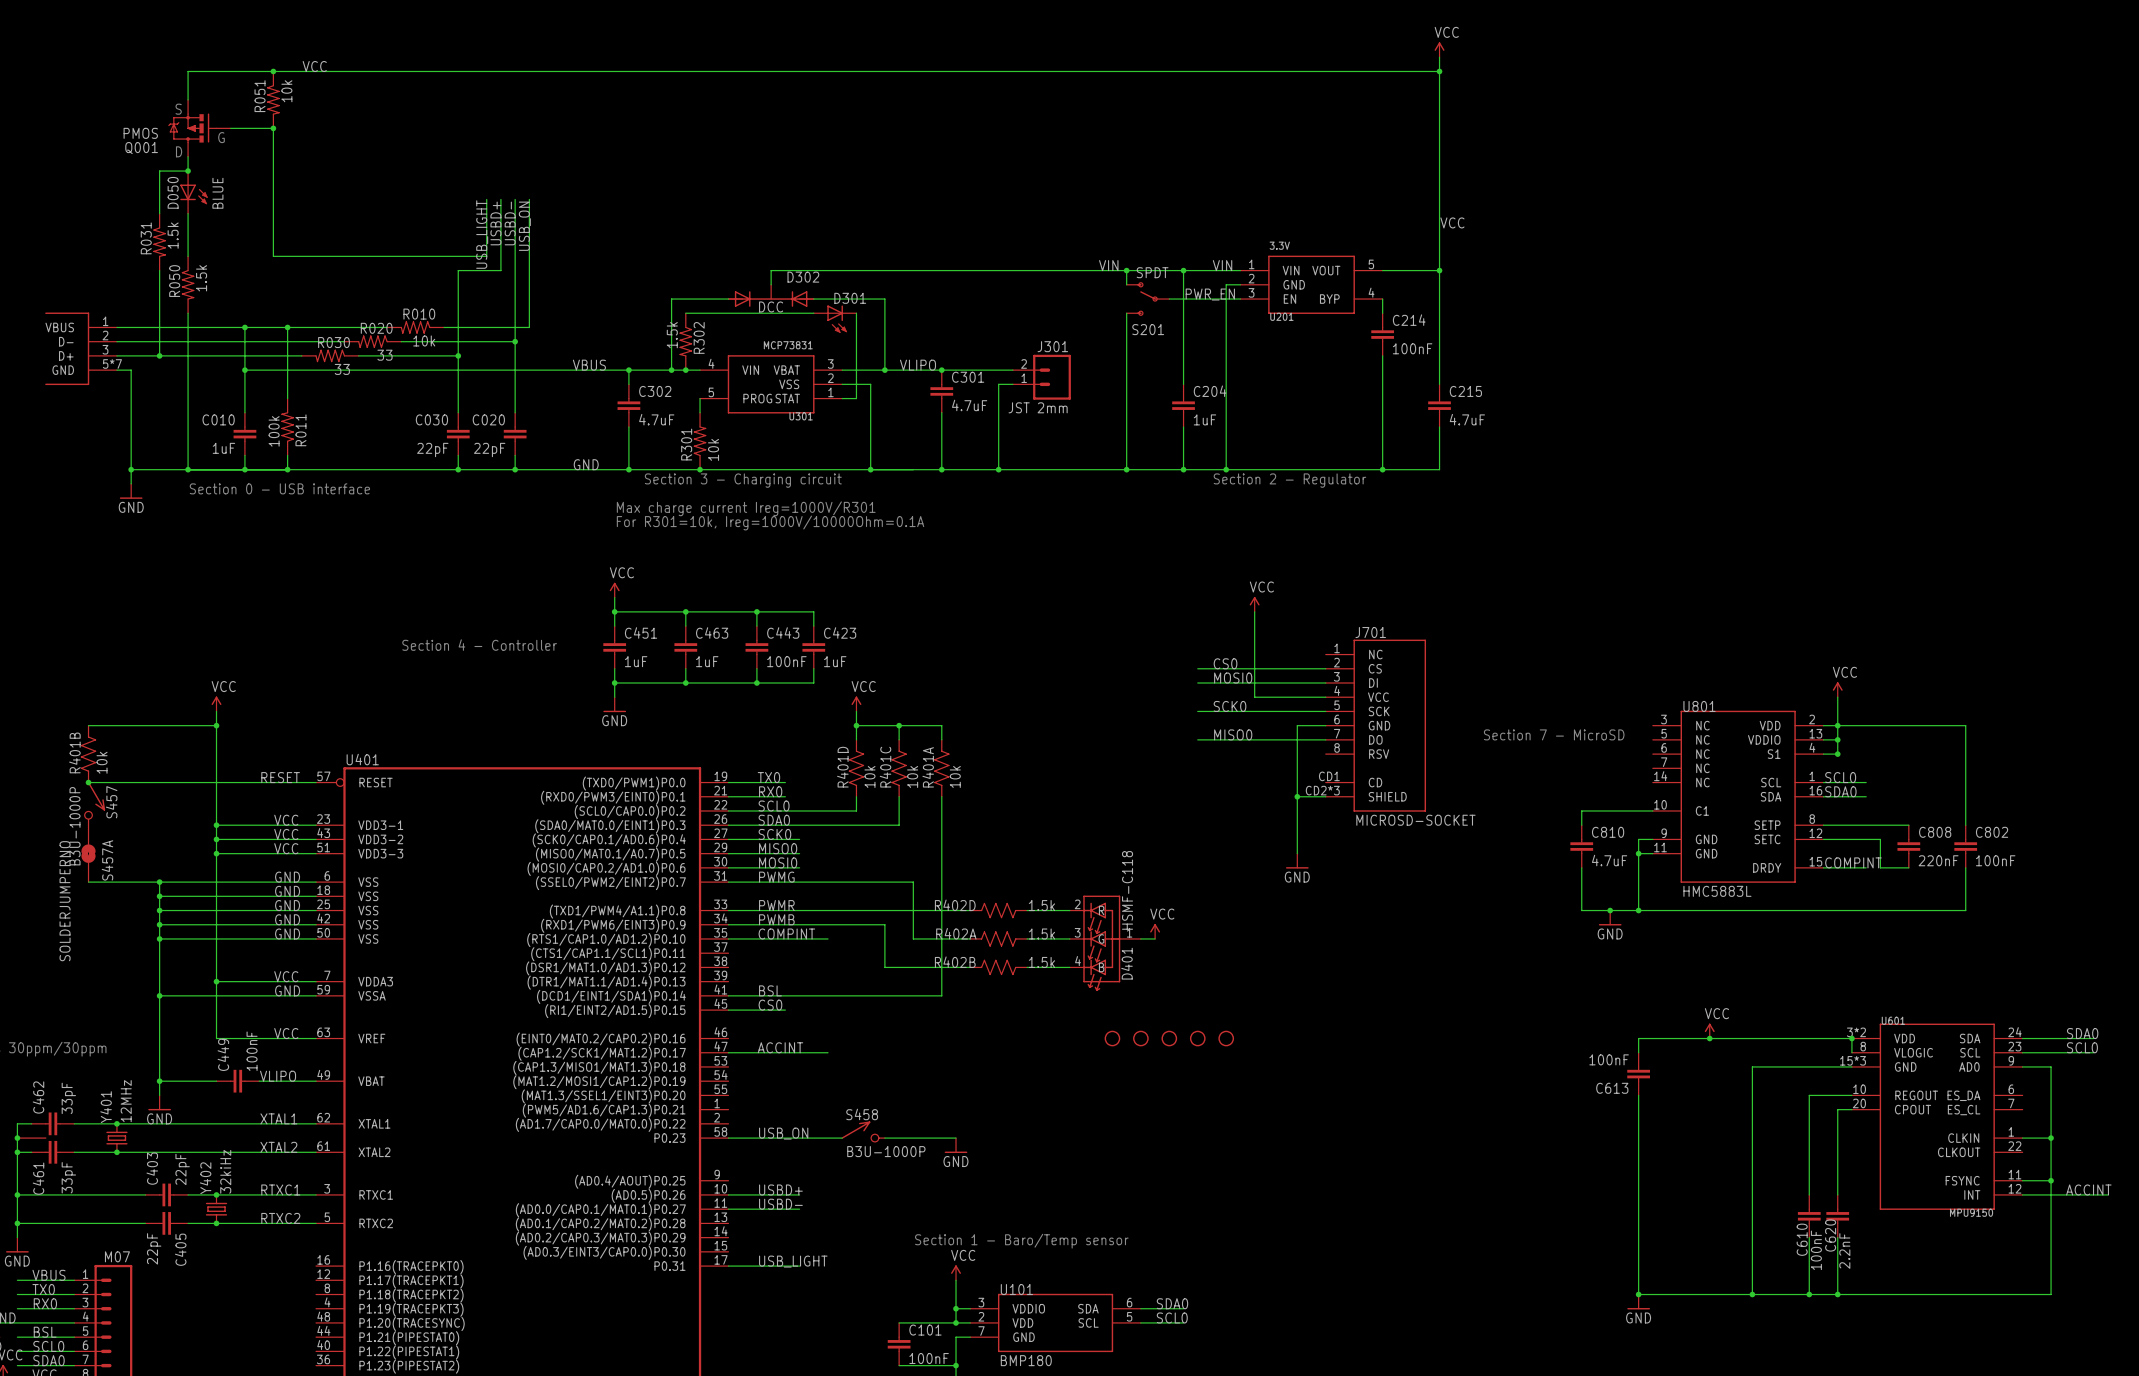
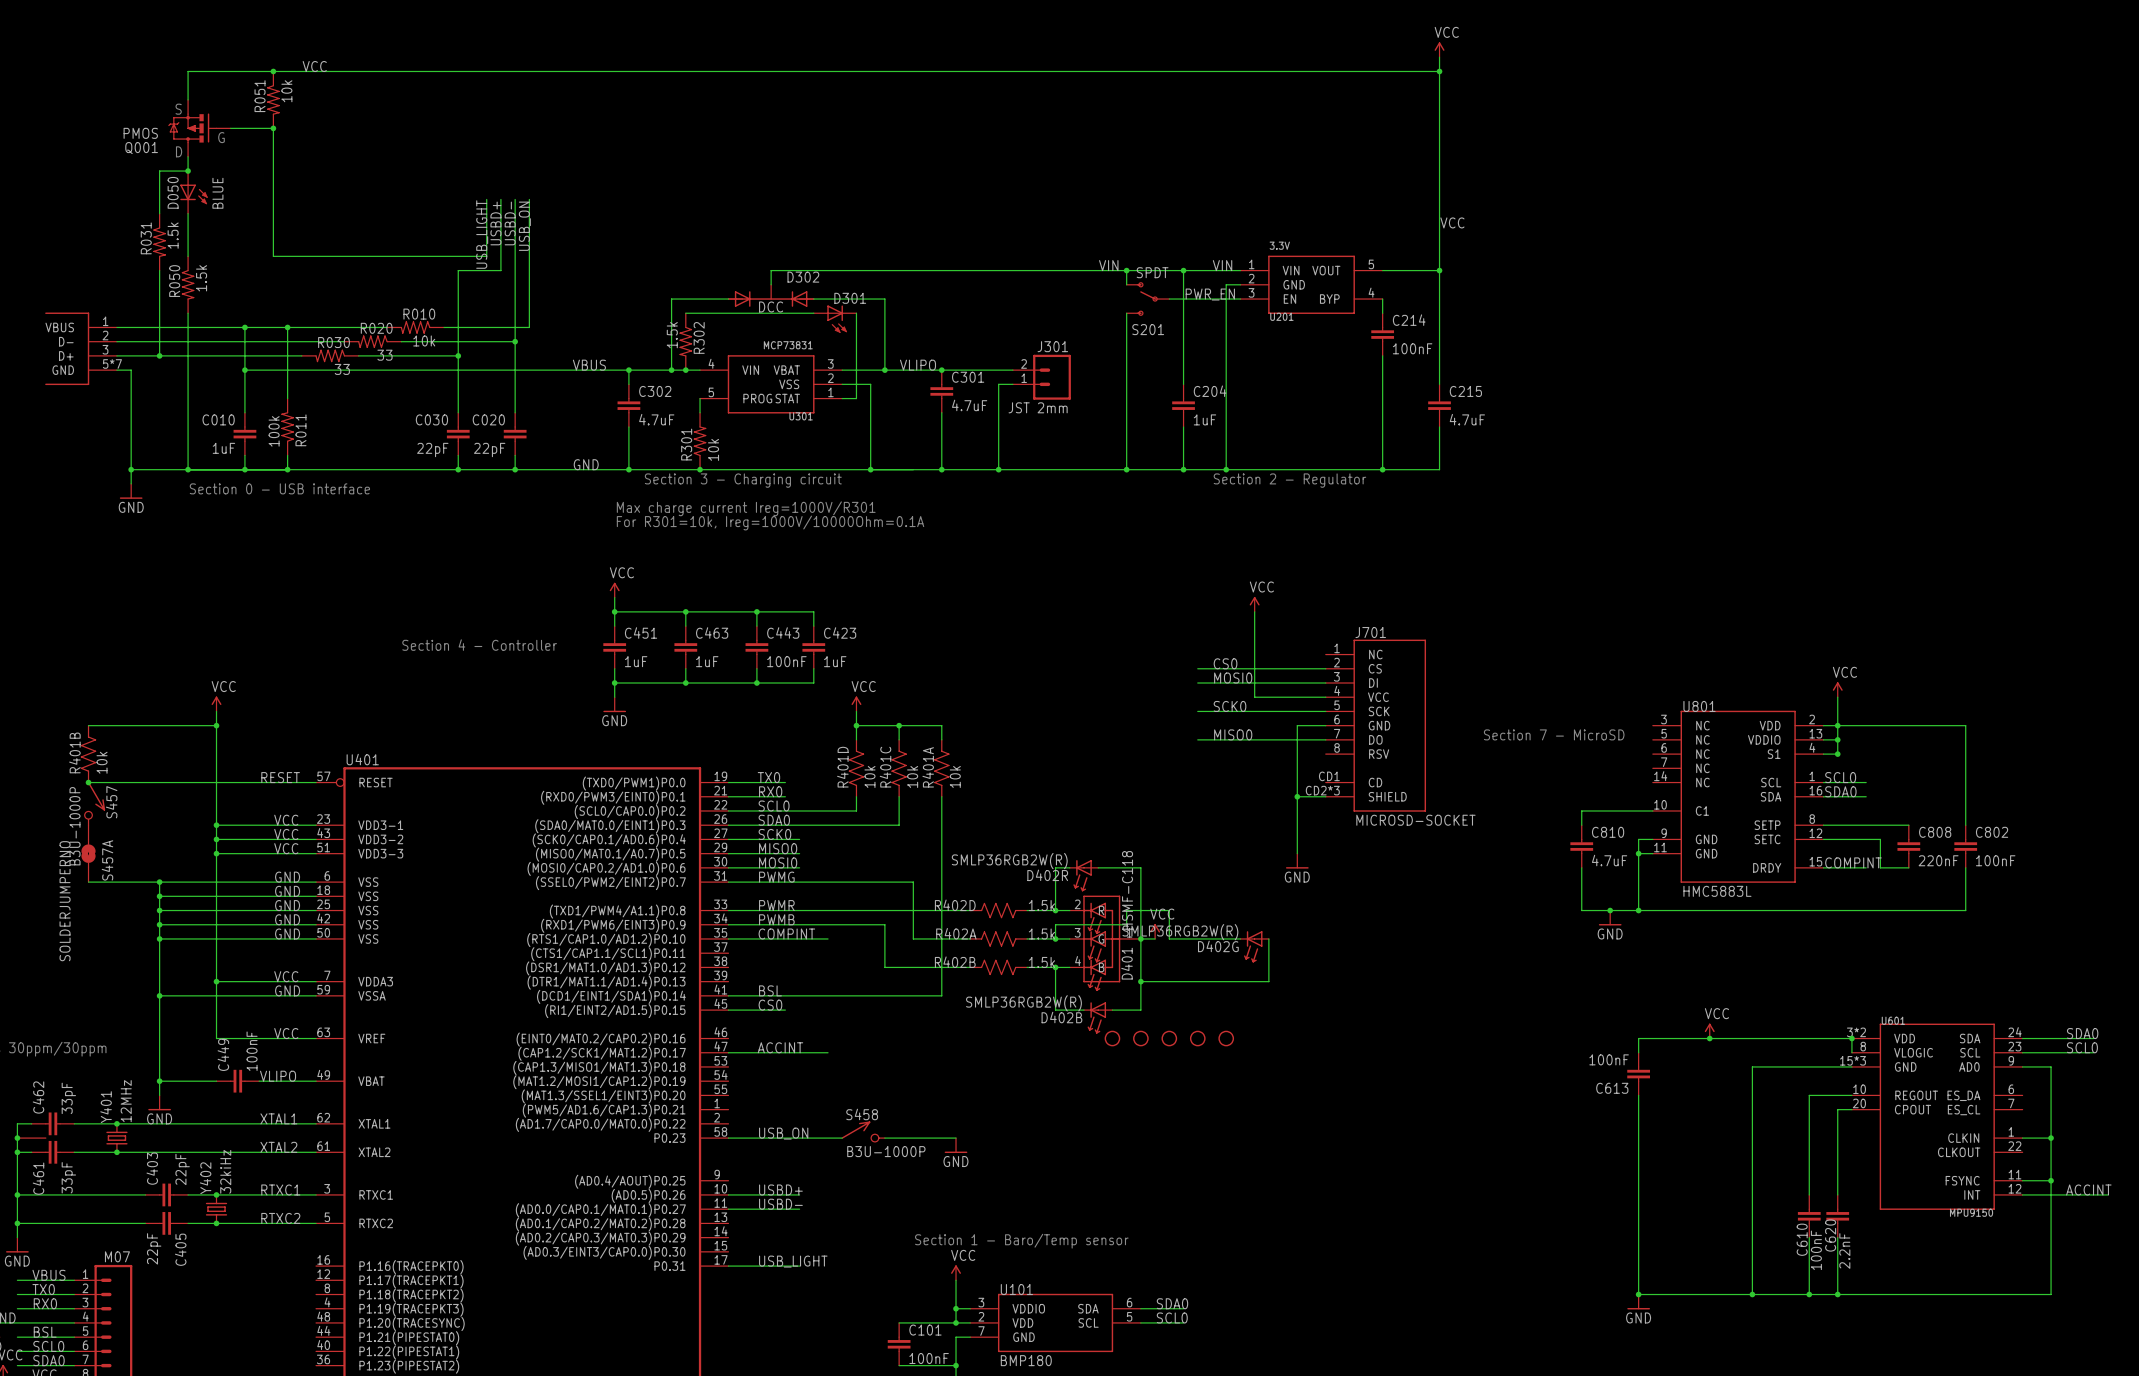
wire: none -> (1069, 867) (1055, 867) (1055, 910)
wire: none -> (1098, 867) (1140, 867) (1140, 1010) (1112, 1010)
D402R: none -> SMLP36RGB2W(R) (1084, 875)
junction: none -> (1055, 910)
wire: none -> (1055, 938) (1055, 924) (1126, 924) (1126, 910) (1169, 910) (1169, 938) (1240, 938)
junction: none -> (1055, 938)
junction: none -> (1140, 938)
wire: none -> (1268, 938) (1268, 981) (1140, 981)
D402G: none -> SMLP36RGB2W(R) (1254, 946)
wire: none -> (1055, 967) (1055, 1010) (1084, 1010)
junction: none -> (1055, 967)
junction: none -> (1140, 981)
D402B: none -> SMLP36RGB2W(R) (1098, 1017)

